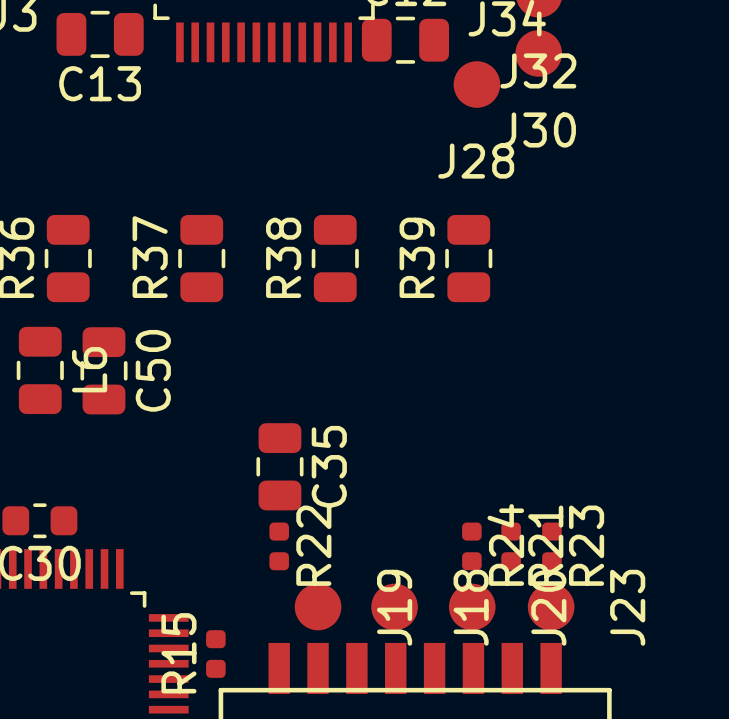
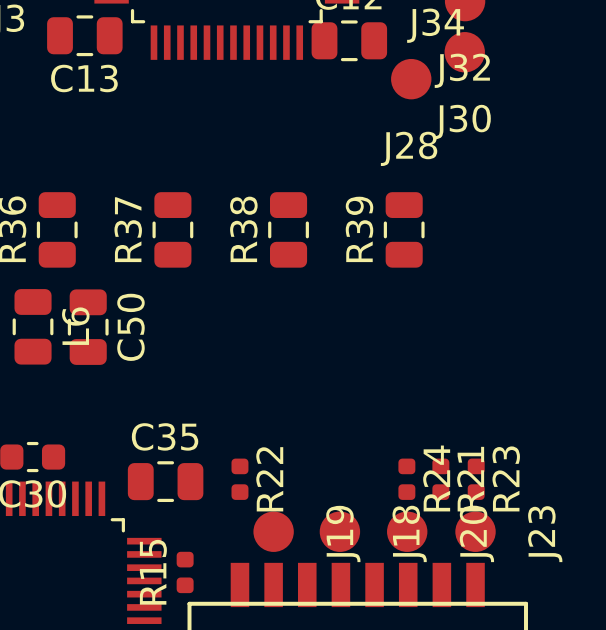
C35 rotation: 0° (279, 466) -> 90° clockwise (165, 481)
C35 position: (279, 466) -> (165, 481)
C35 name position: C35 (329, 466) -> C35 (165, 436)

